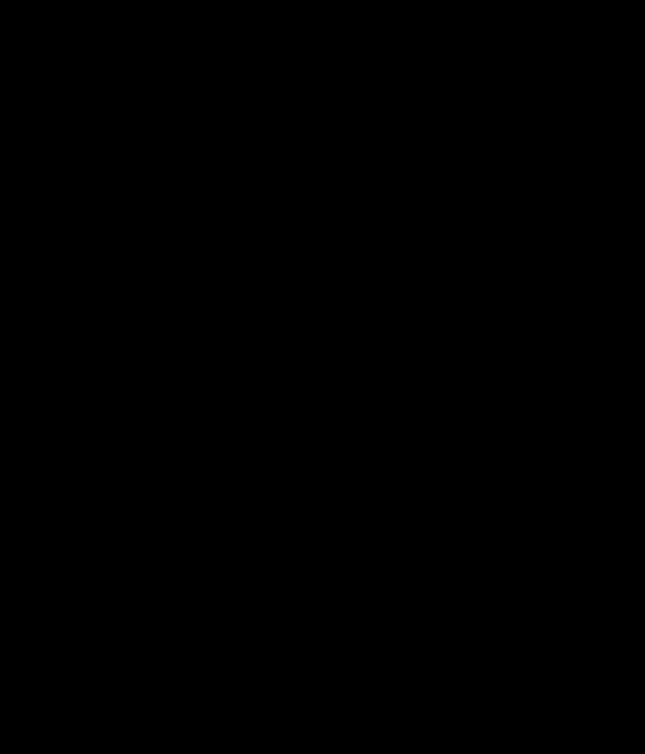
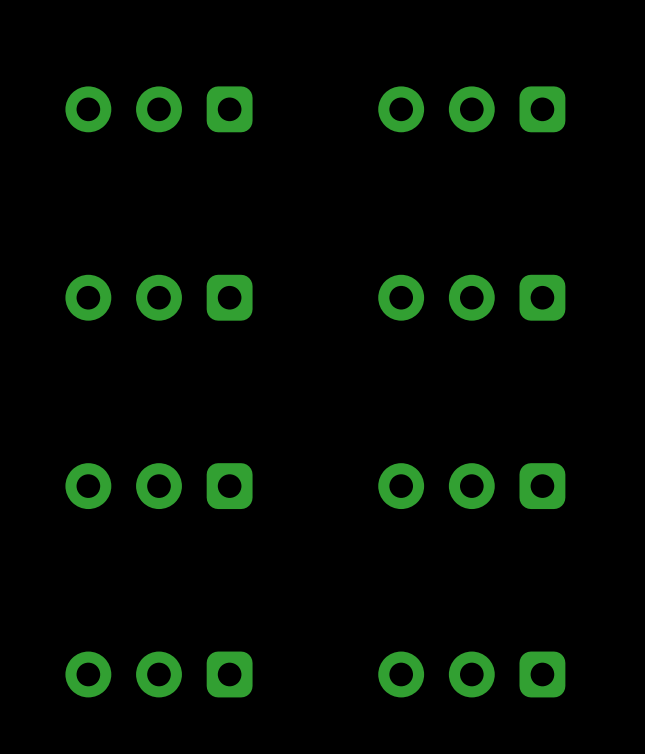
part: none -> (158, 109)
part: none -> (471, 109)
part: none -> (158, 297)
part: none -> (471, 297)
part: none -> (158, 486)
part: none -> (471, 486)
part: none -> (158, 674)
part: none -> (471, 674)

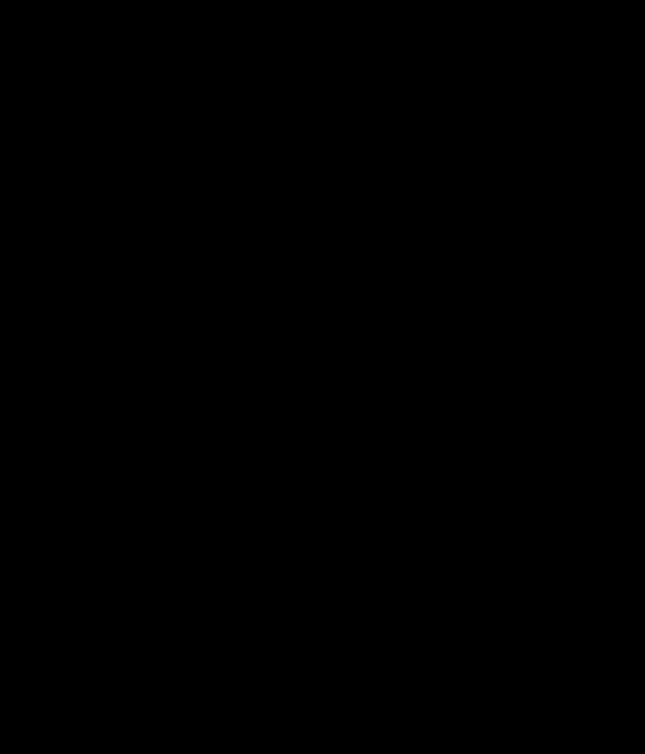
part: (158, 109) -> none
part: (471, 109) -> none
part: (158, 297) -> none
part: (471, 297) -> none
part: (158, 486) -> none
part: (471, 486) -> none
part: (158, 674) -> none
part: (471, 674) -> none

